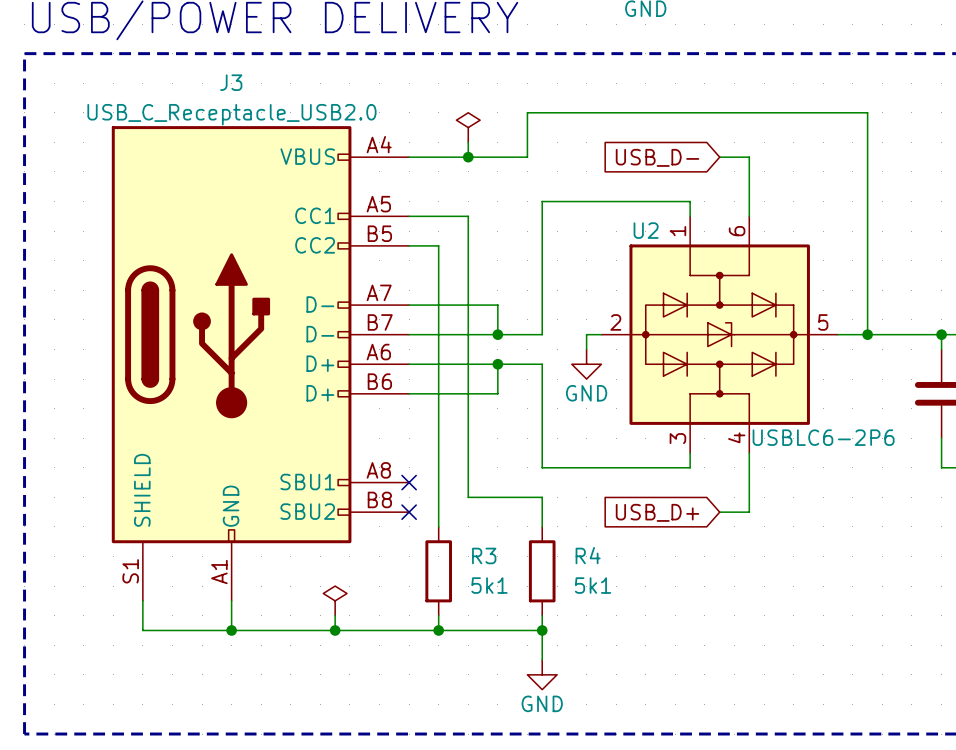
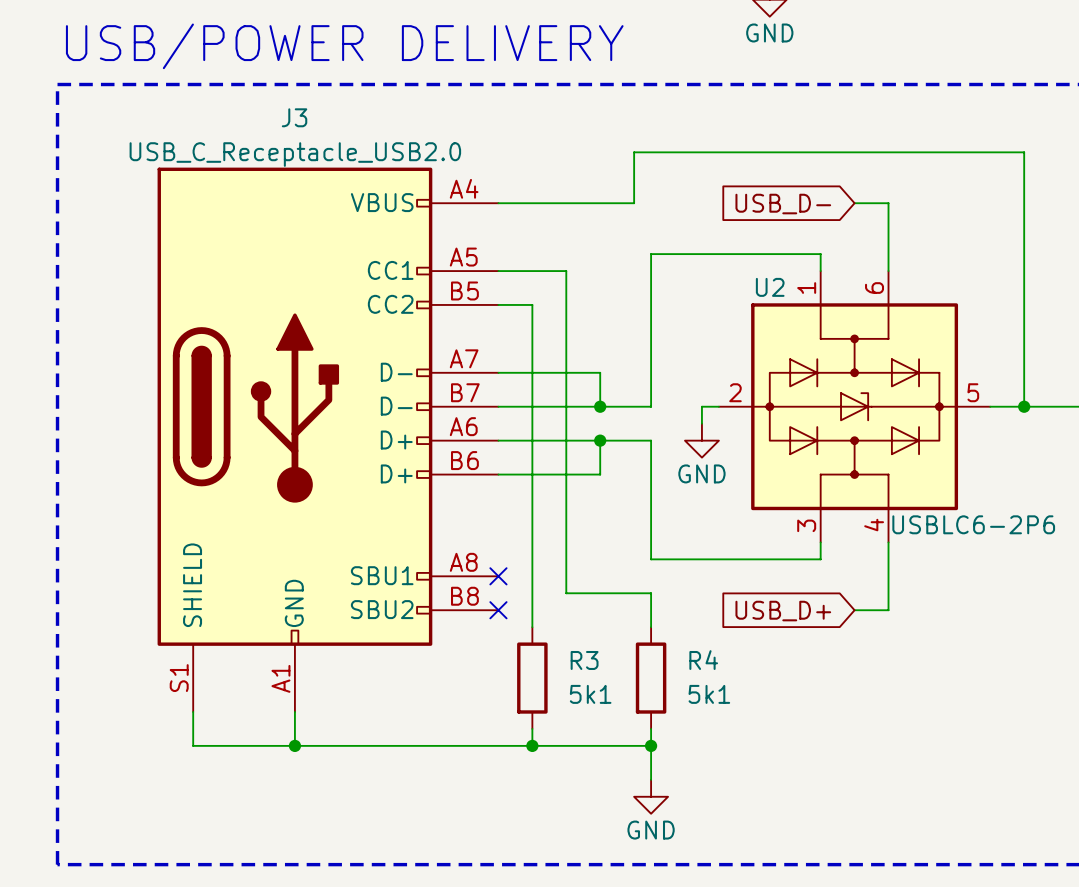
power symbol: (468, 127) -> none
wire: (468, 142) (468, 157) -> none
junction: (468, 157) -> none
power symbol: (335, 600) -> none
wire: (335, 615) (335, 630) -> none
junction: (335, 630) -> none

